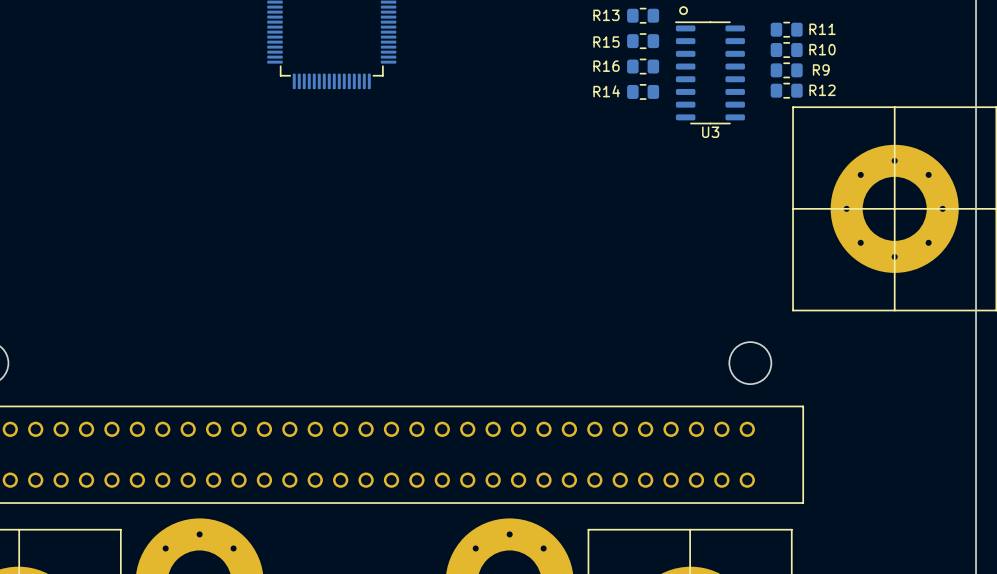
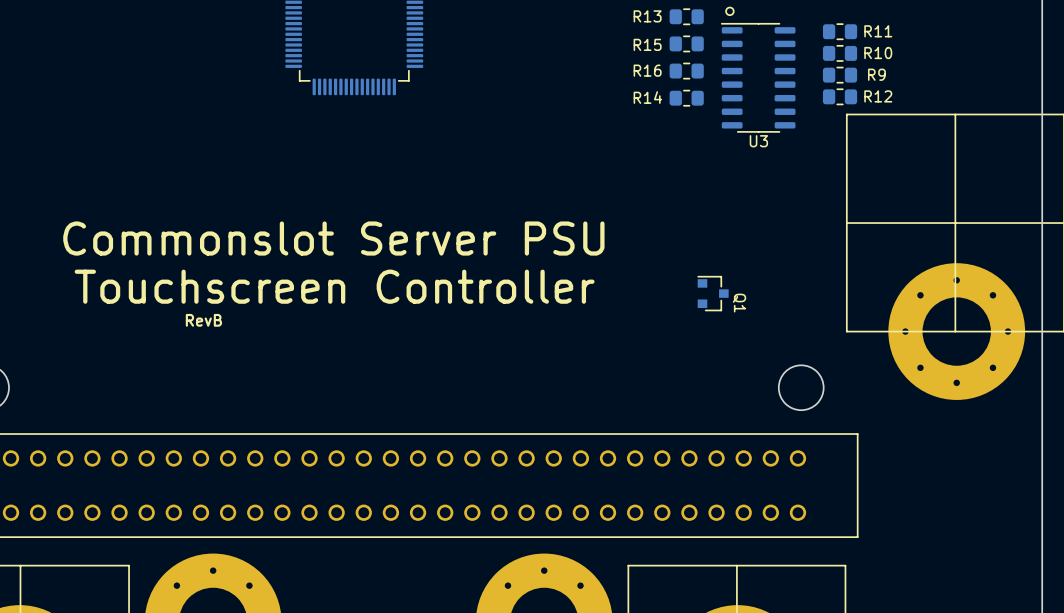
part position: (894, 208) -> (956, 331)
text: none -> Commonslot Server PSU (333, 238)
text: none -> Touchscreen Controller (334, 286)
Q1: none -> (713, 293)
text: none -> RevB (203, 320)

